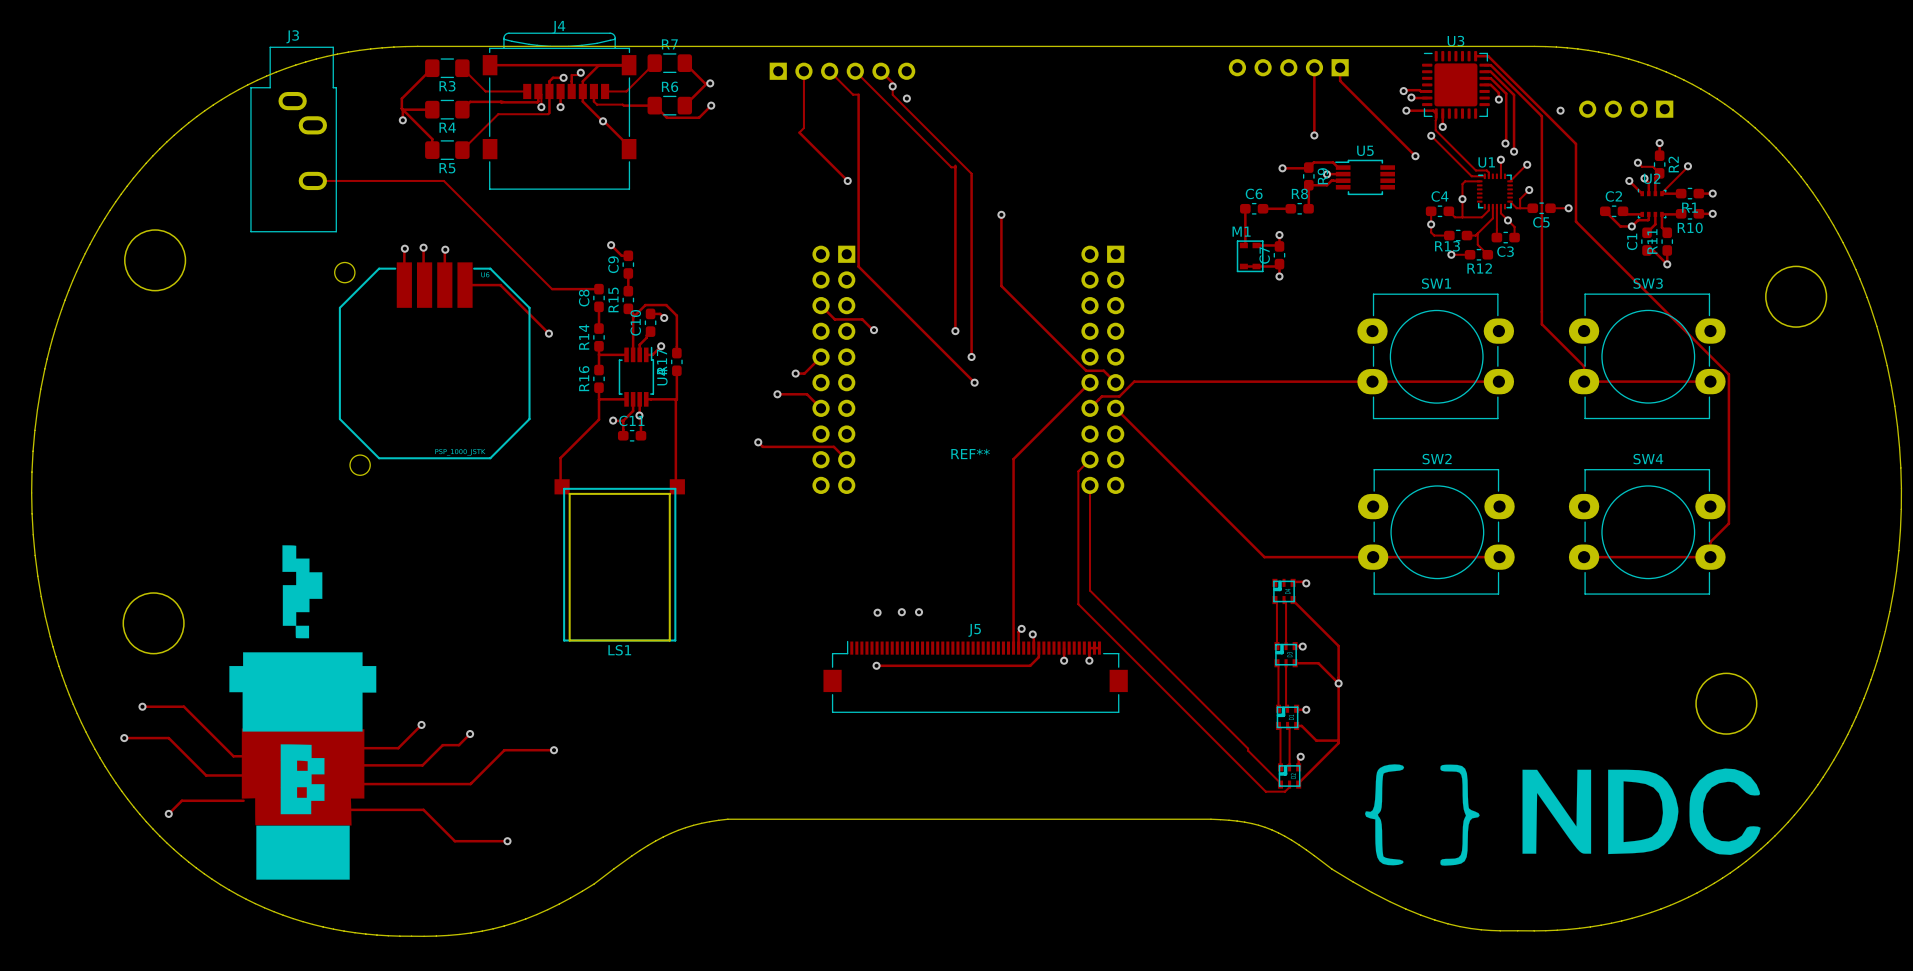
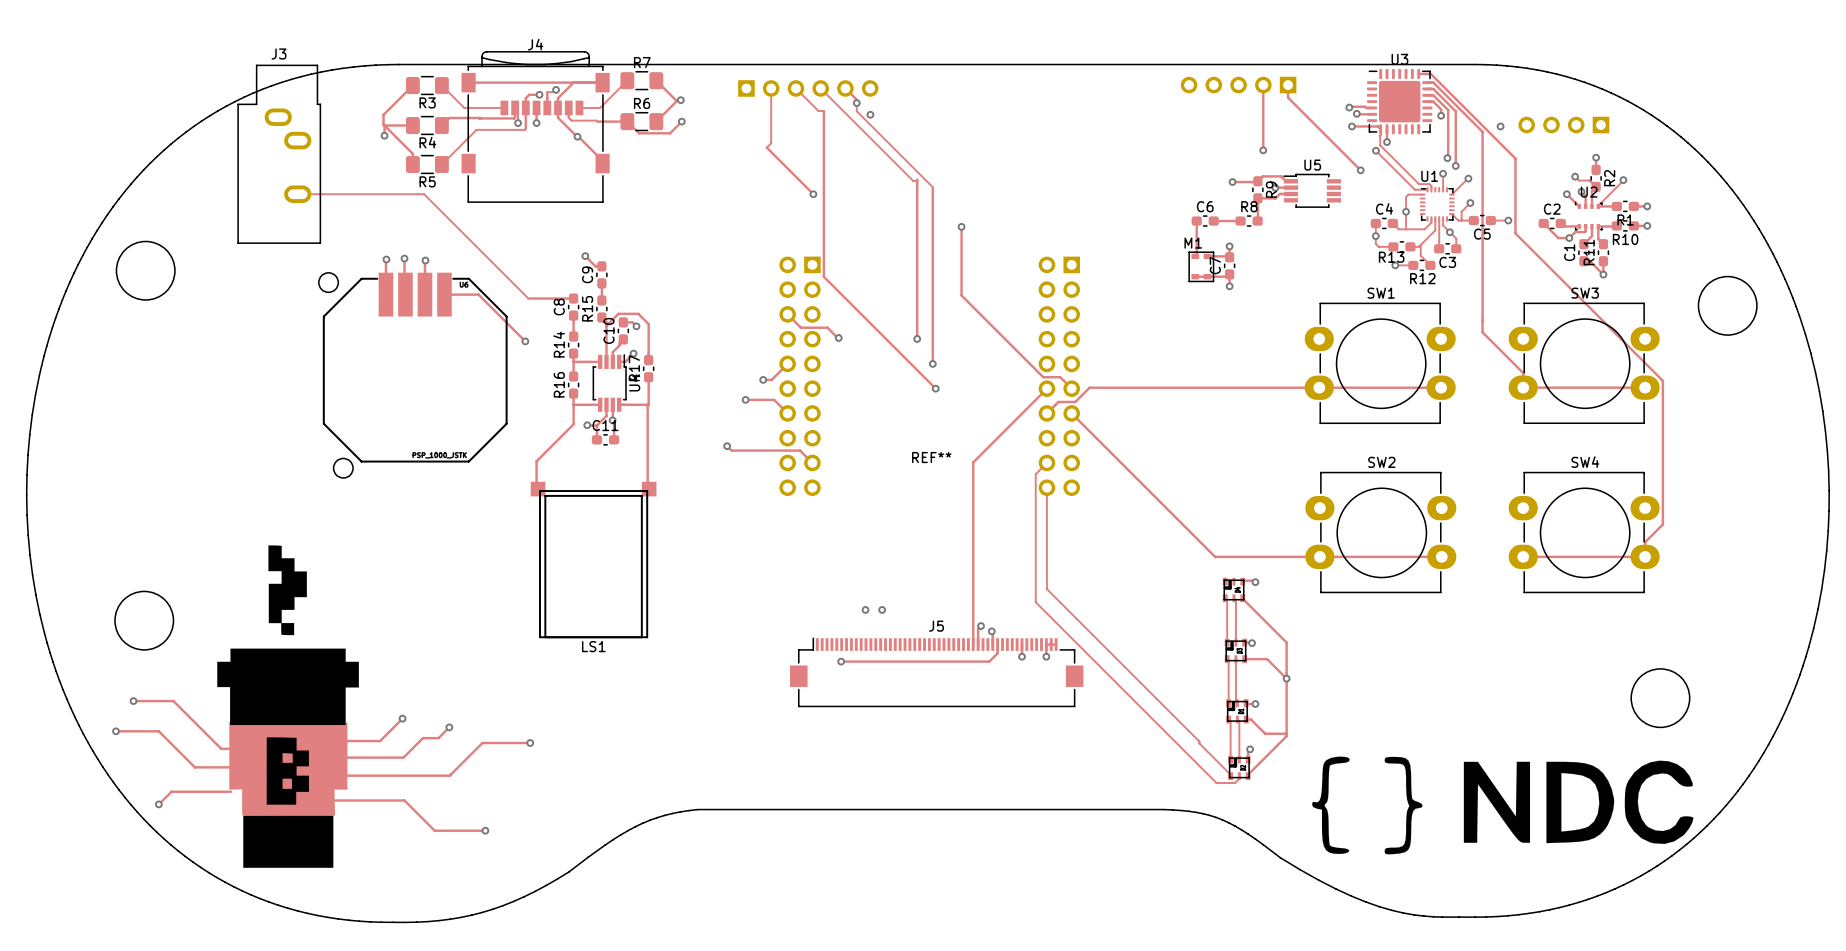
via: (877, 612) -> none

